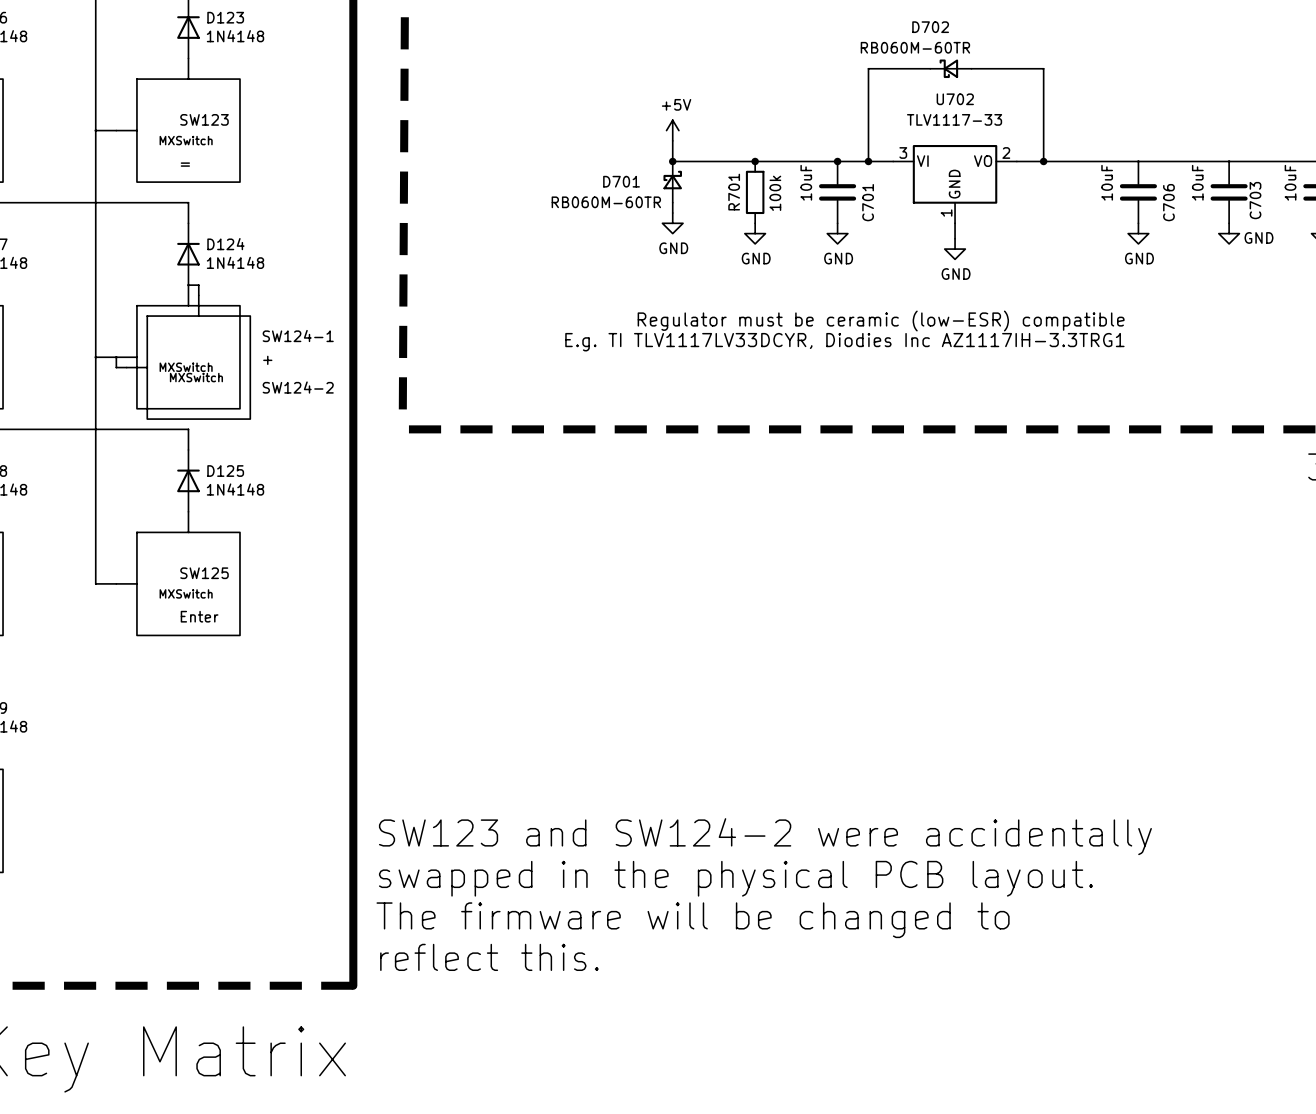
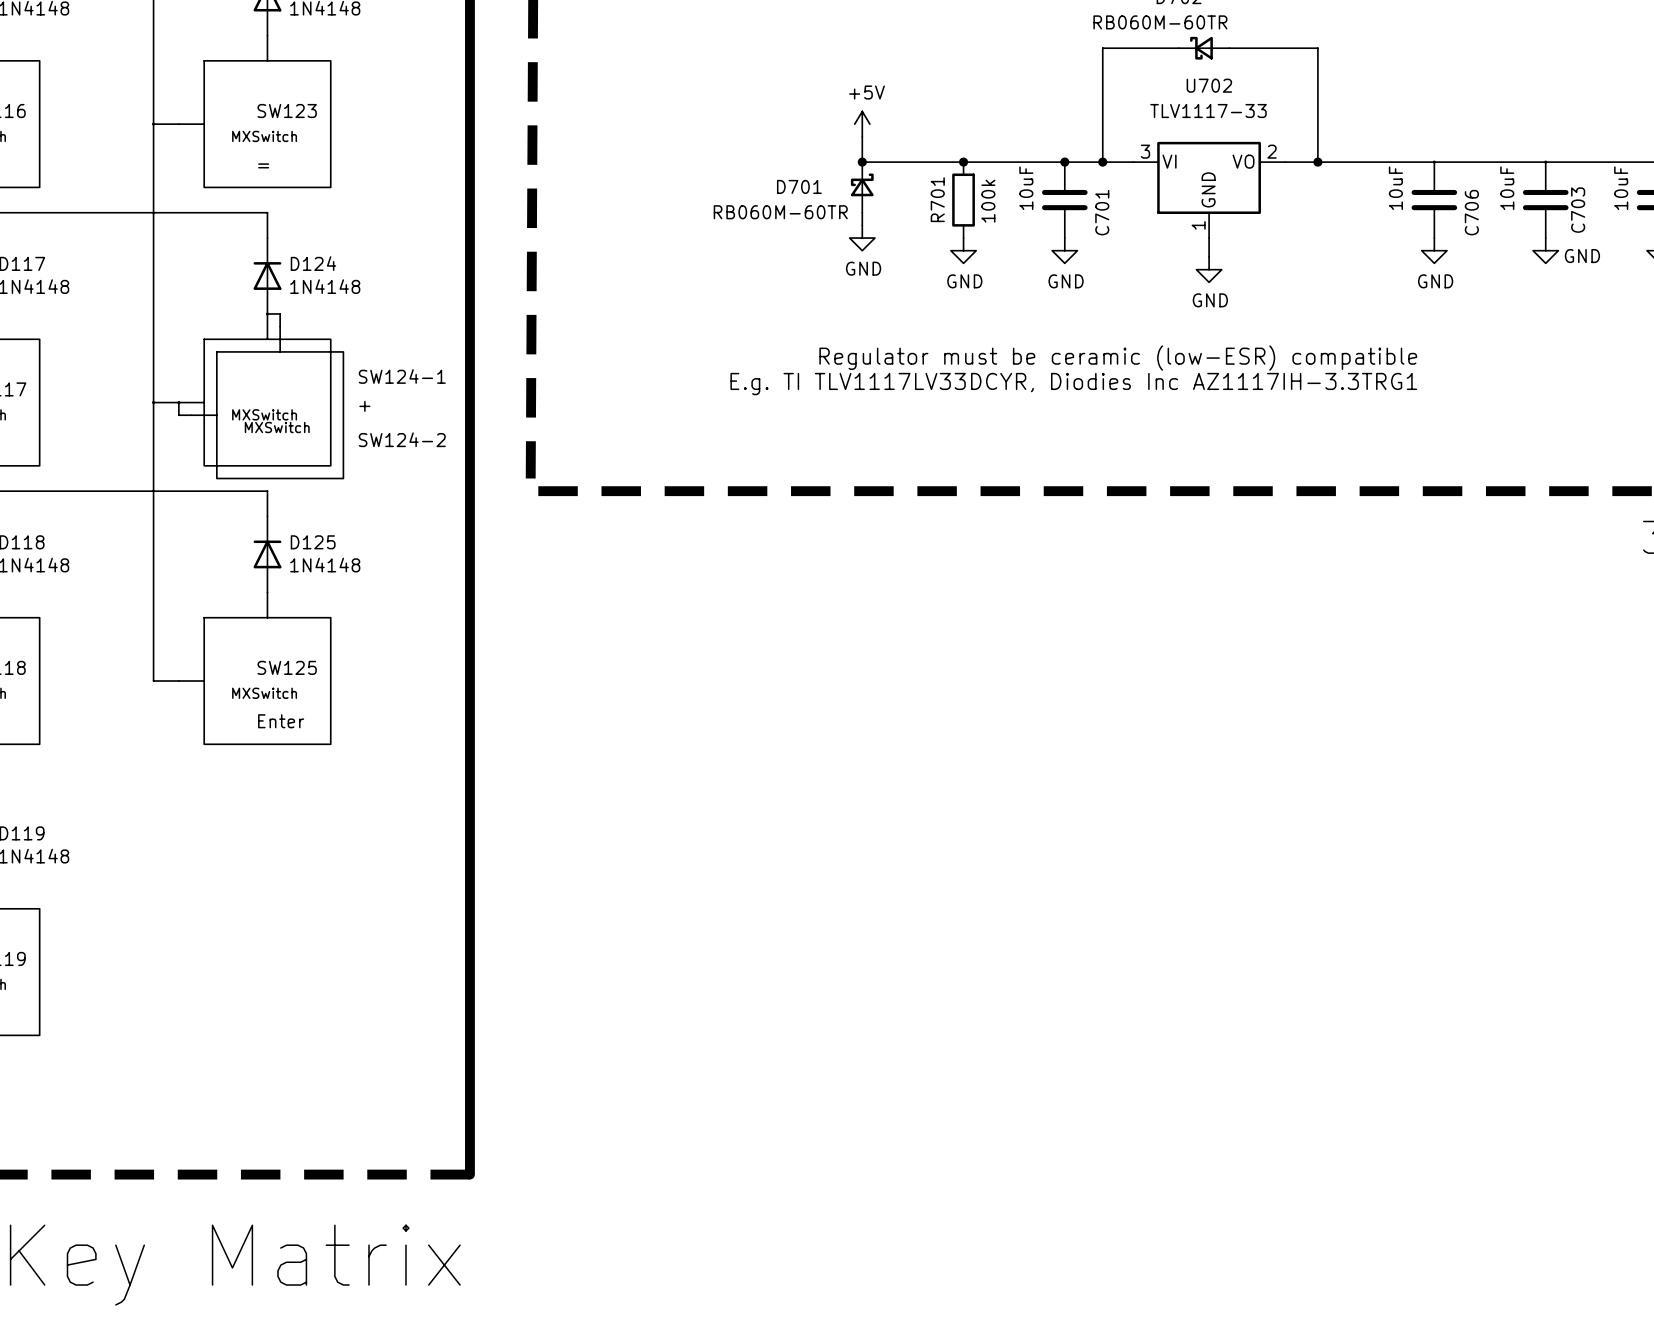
text: SW123 and SW124-2 were accidentally (765, 836) -> none
text: swapped in the physical PCB layout. (735, 878) -> none
text: The firmware will be changed to (693, 920) -> none
text: reflect this. (489, 957) -> none

